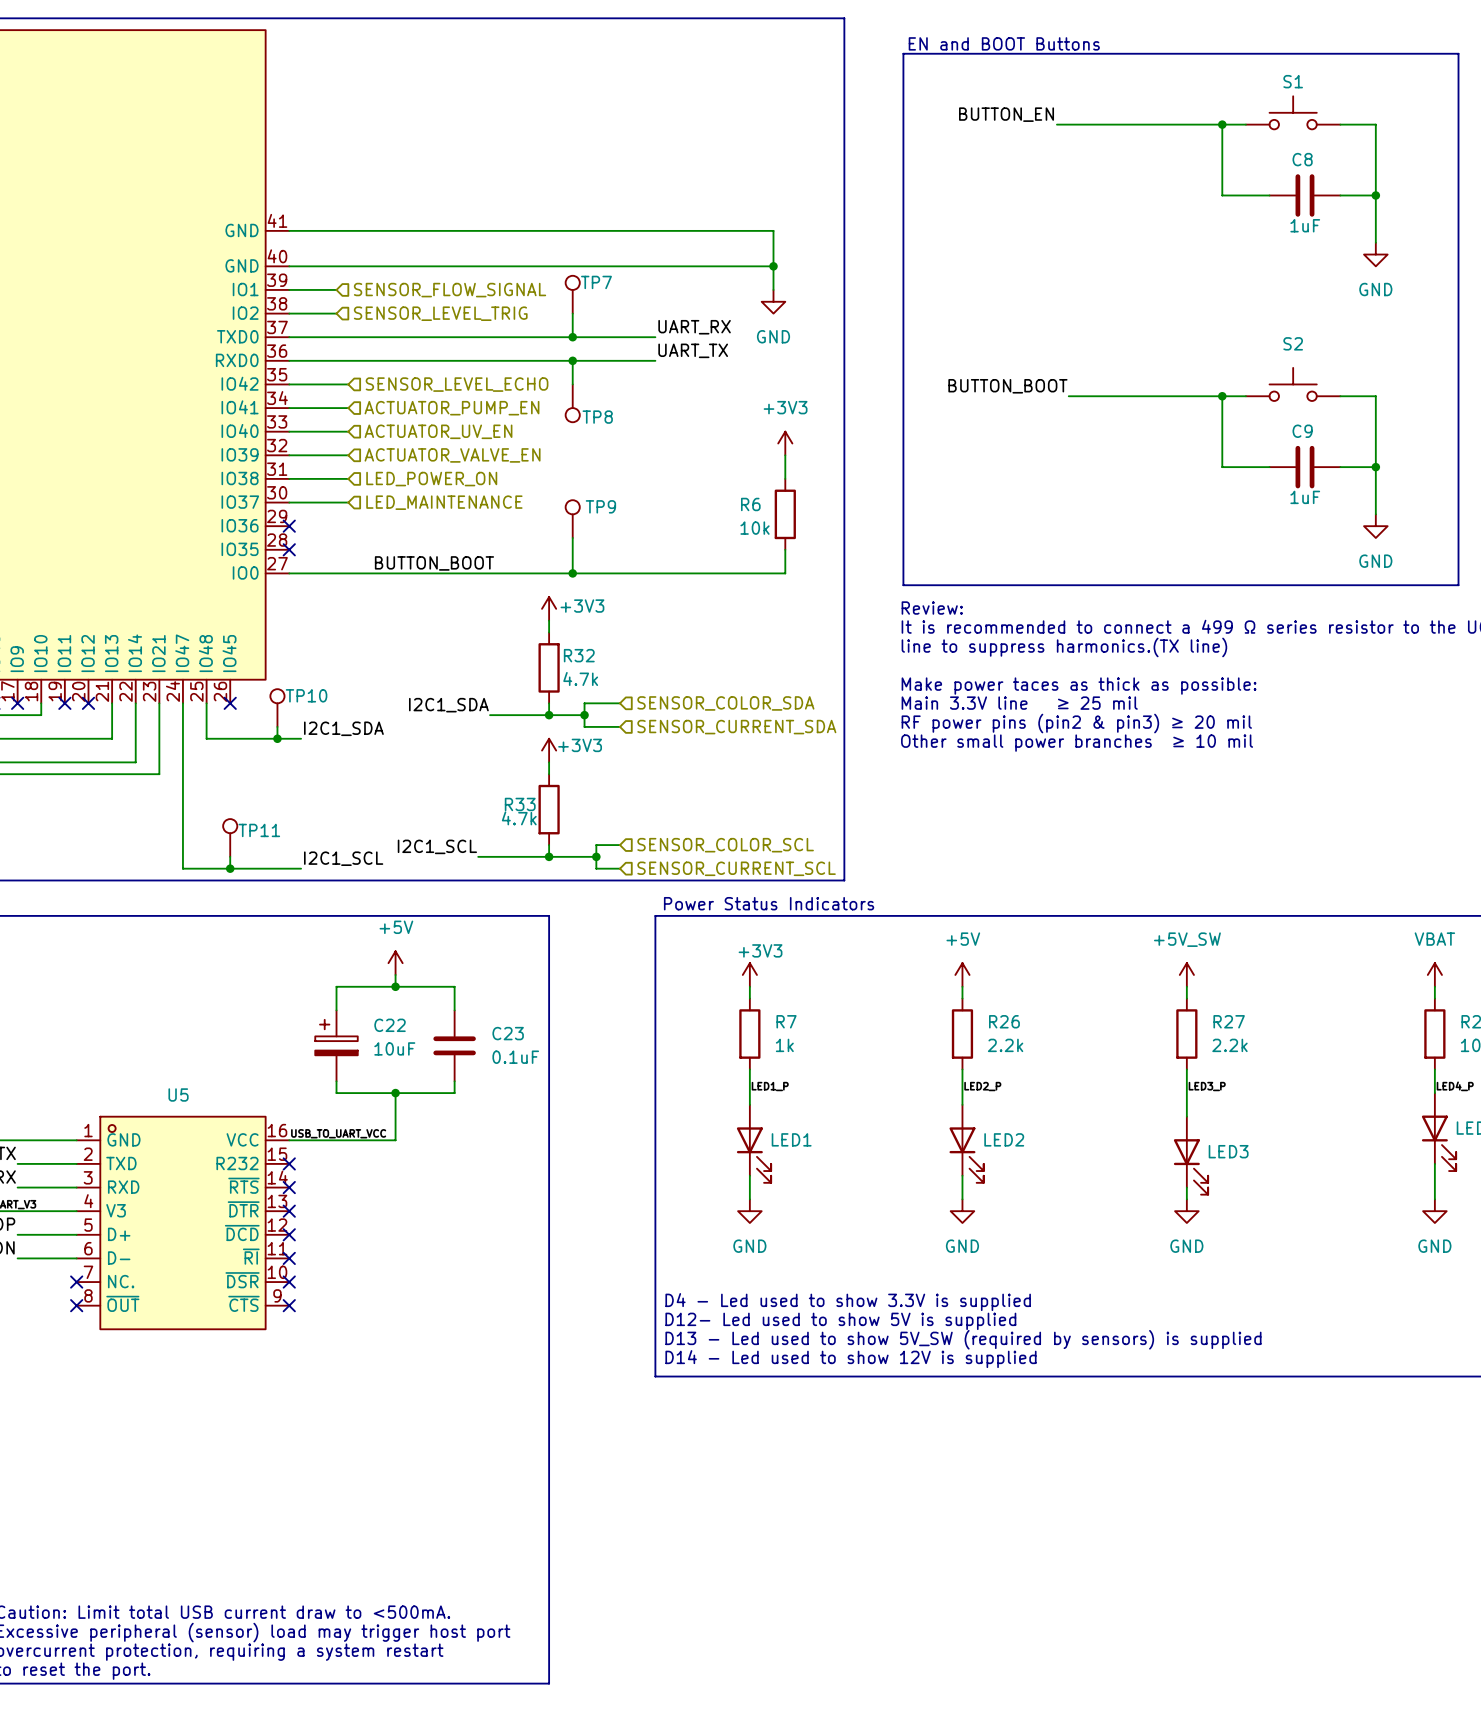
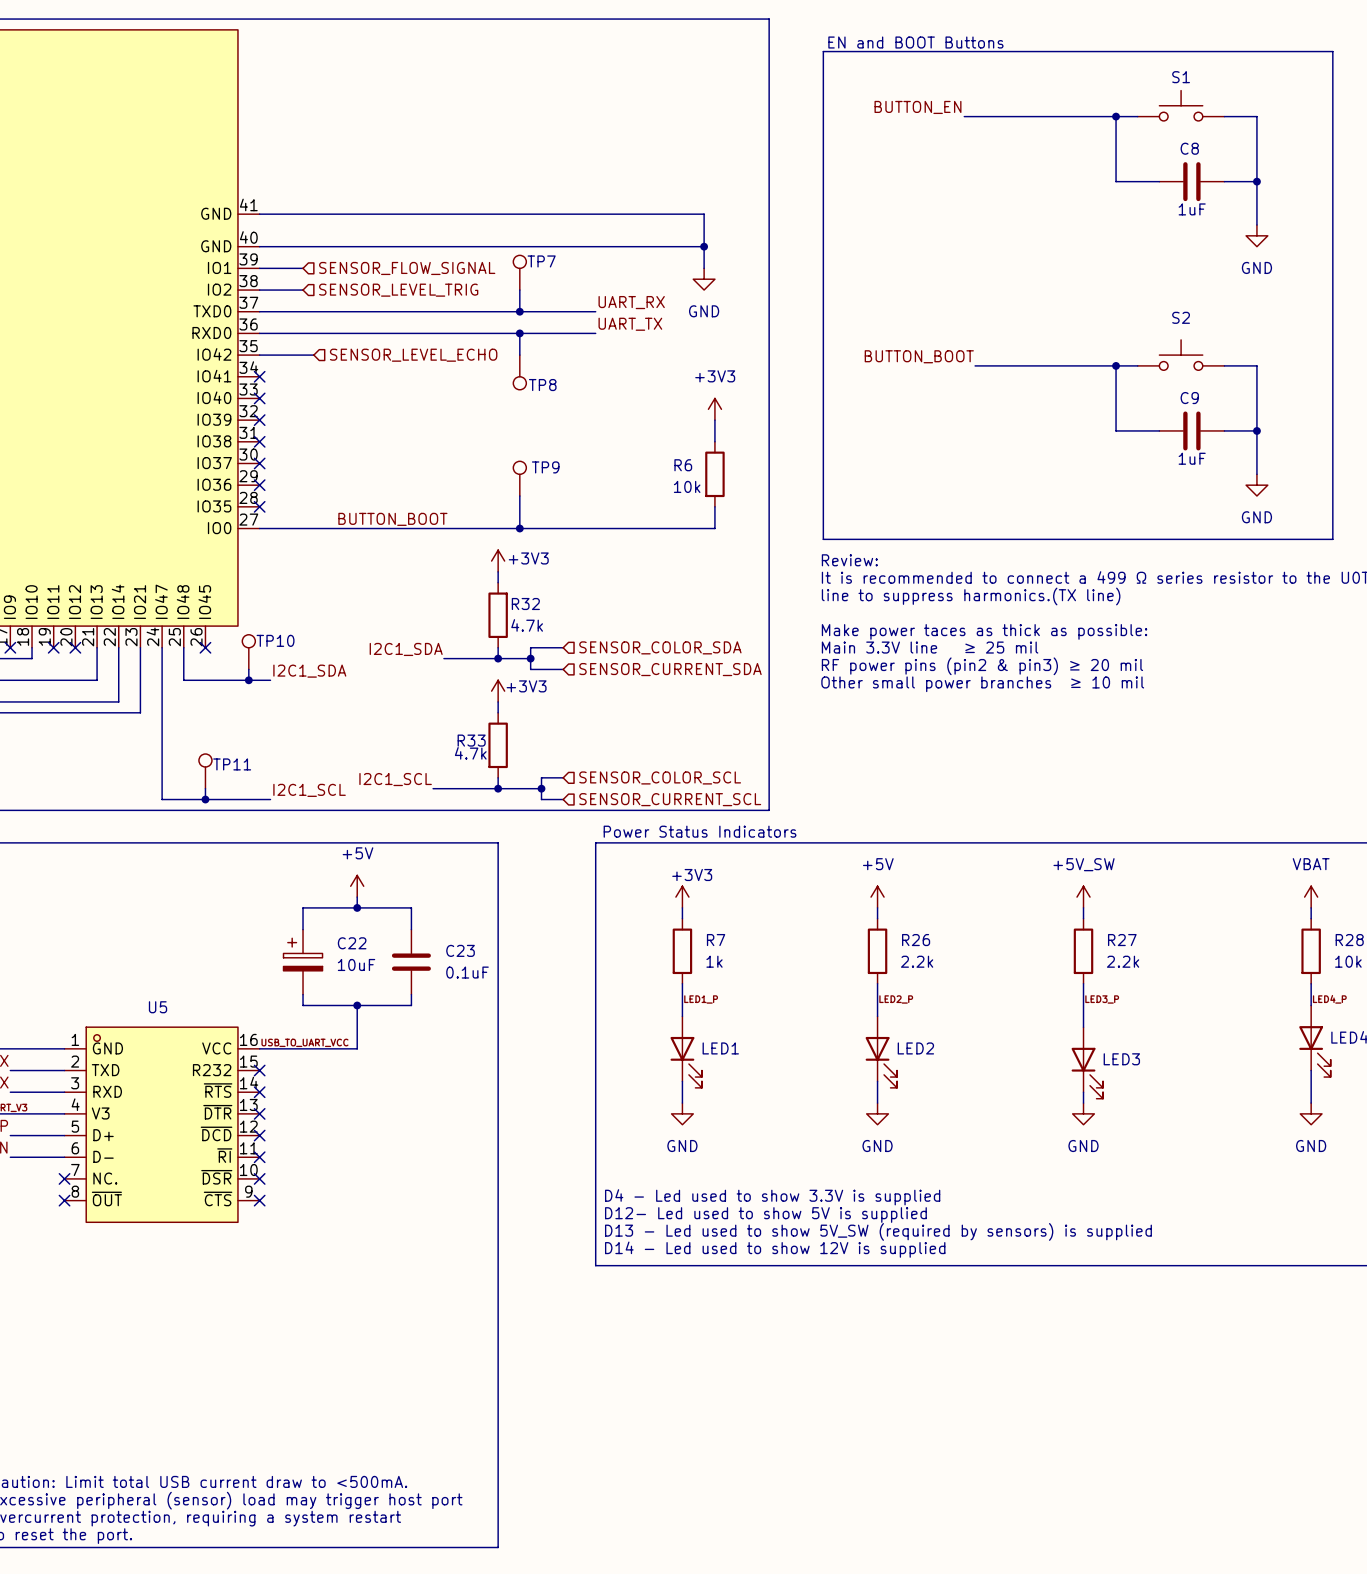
wire: (289, 408) (348, 408) -> none
no-connect mark: none -> (259, 376)
hierarchical label: ACTUATOR_PUMP_EN (451, 408) -> none
wire: (289, 431) (348, 431) -> none
no-connect mark: none -> (259, 398)
hierarchical label: ACTUATOR_UV_EN (438, 431) -> none
wire: (289, 455) (348, 455) -> none
no-connect mark: none -> (259, 420)
hierarchical label: ACTUATOR_VALVE_EN (452, 455) -> none
wire: (289, 478) (348, 478) -> none
no-connect mark: none -> (259, 441)
hierarchical label: LED_POWER_ON (431, 479) -> none
wire: (289, 502) (348, 502) -> none
no-connect mark: none -> (259, 463)
hierarchical label: LED_MAINTENANCE (444, 502) -> none

